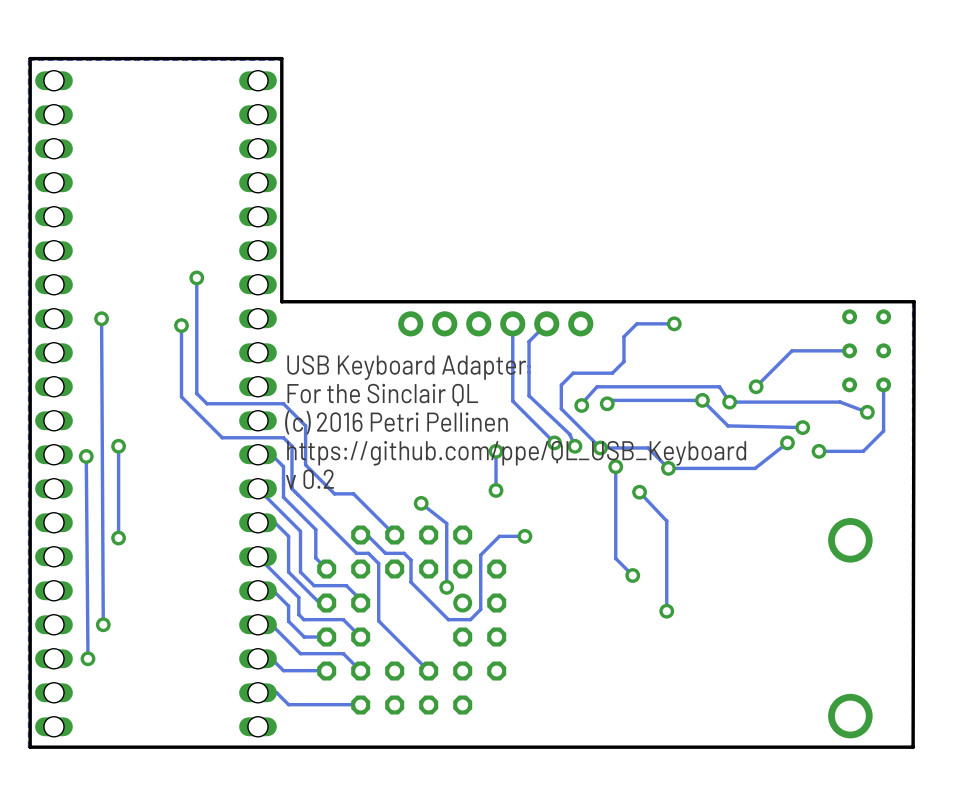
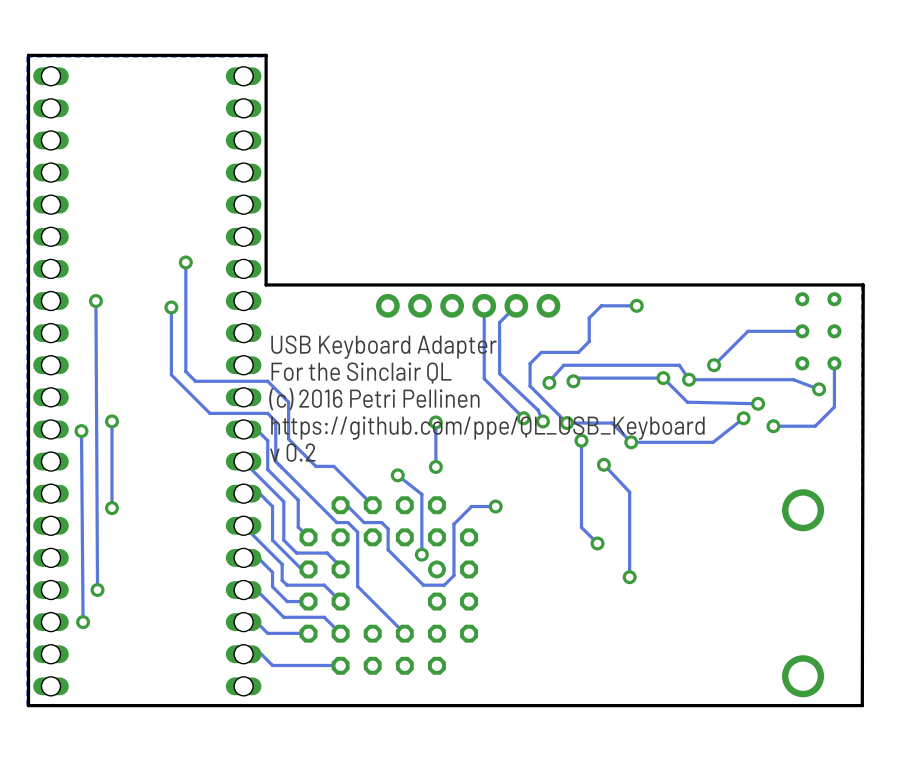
track: none -> (435, 422) (435, 466)
via: none -> (435, 422)
track: (496, 451) (496, 490) -> none
via: (496, 451) -> none
via: (496, 490) -> none
via: none -> (435, 466)

